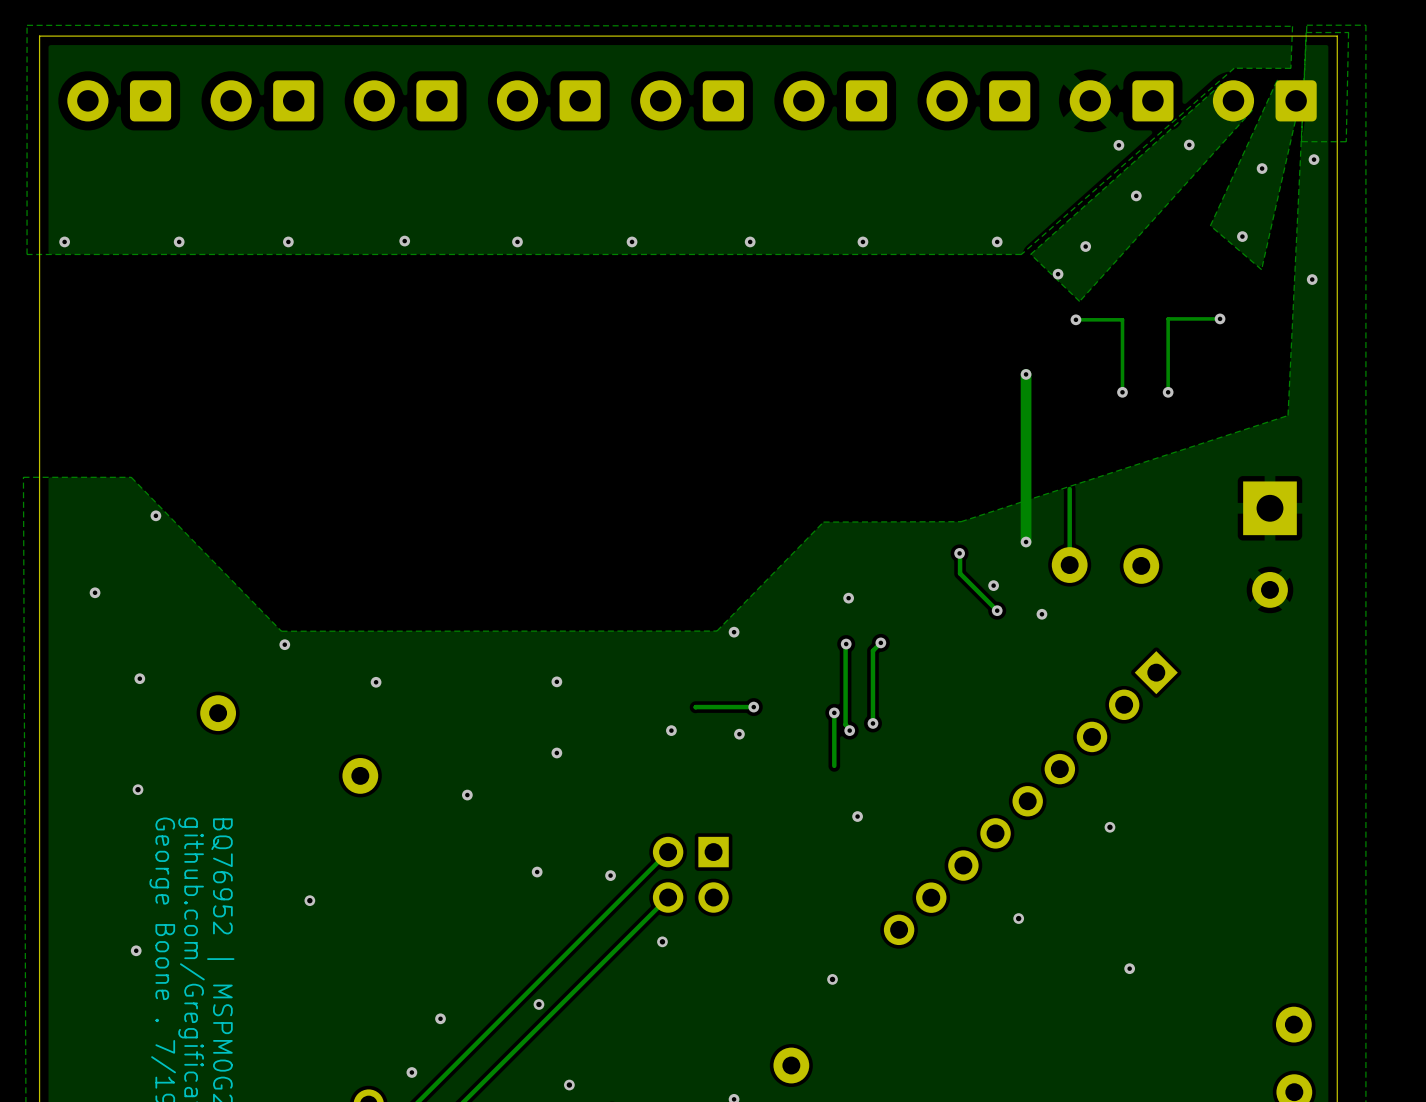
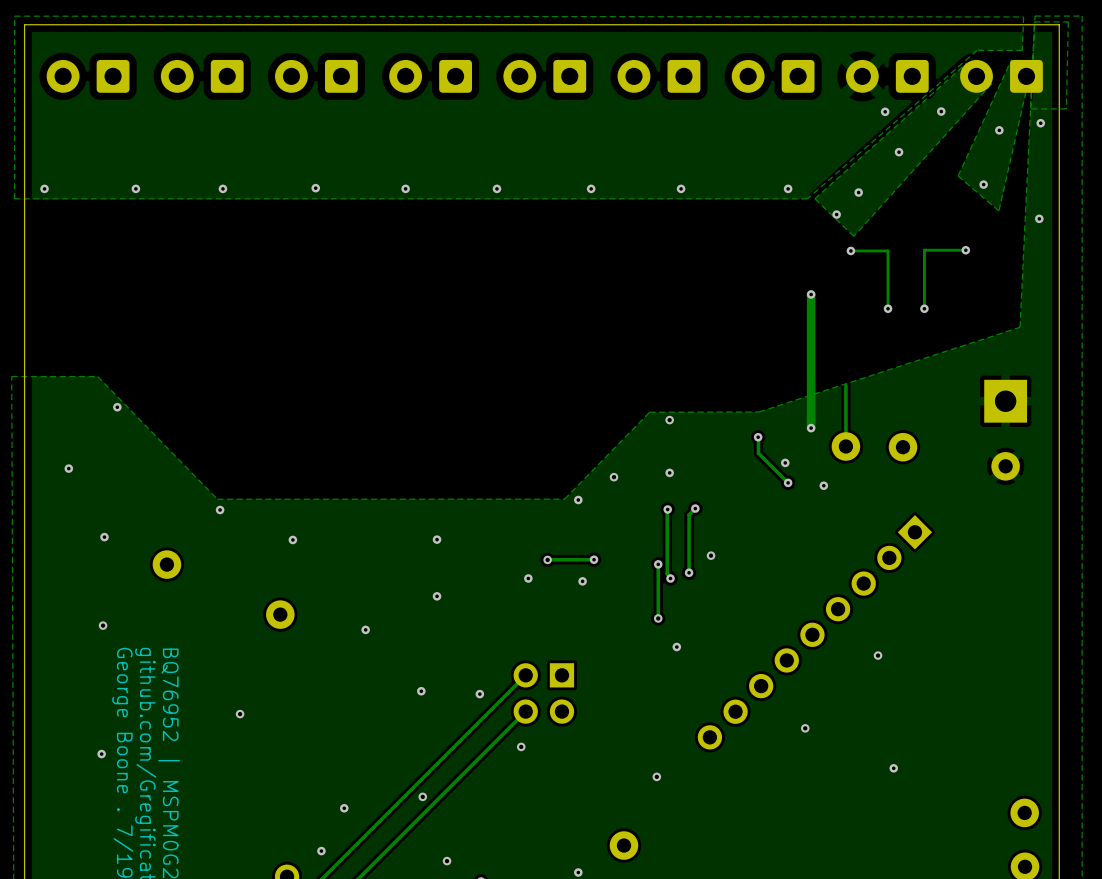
via: none -> (669, 420)
via: none -> (614, 477)
via: none -> (711, 555)
via: none -> (547, 559)
track: none -> (658, 606) (658, 618)
via: none -> (658, 618)

